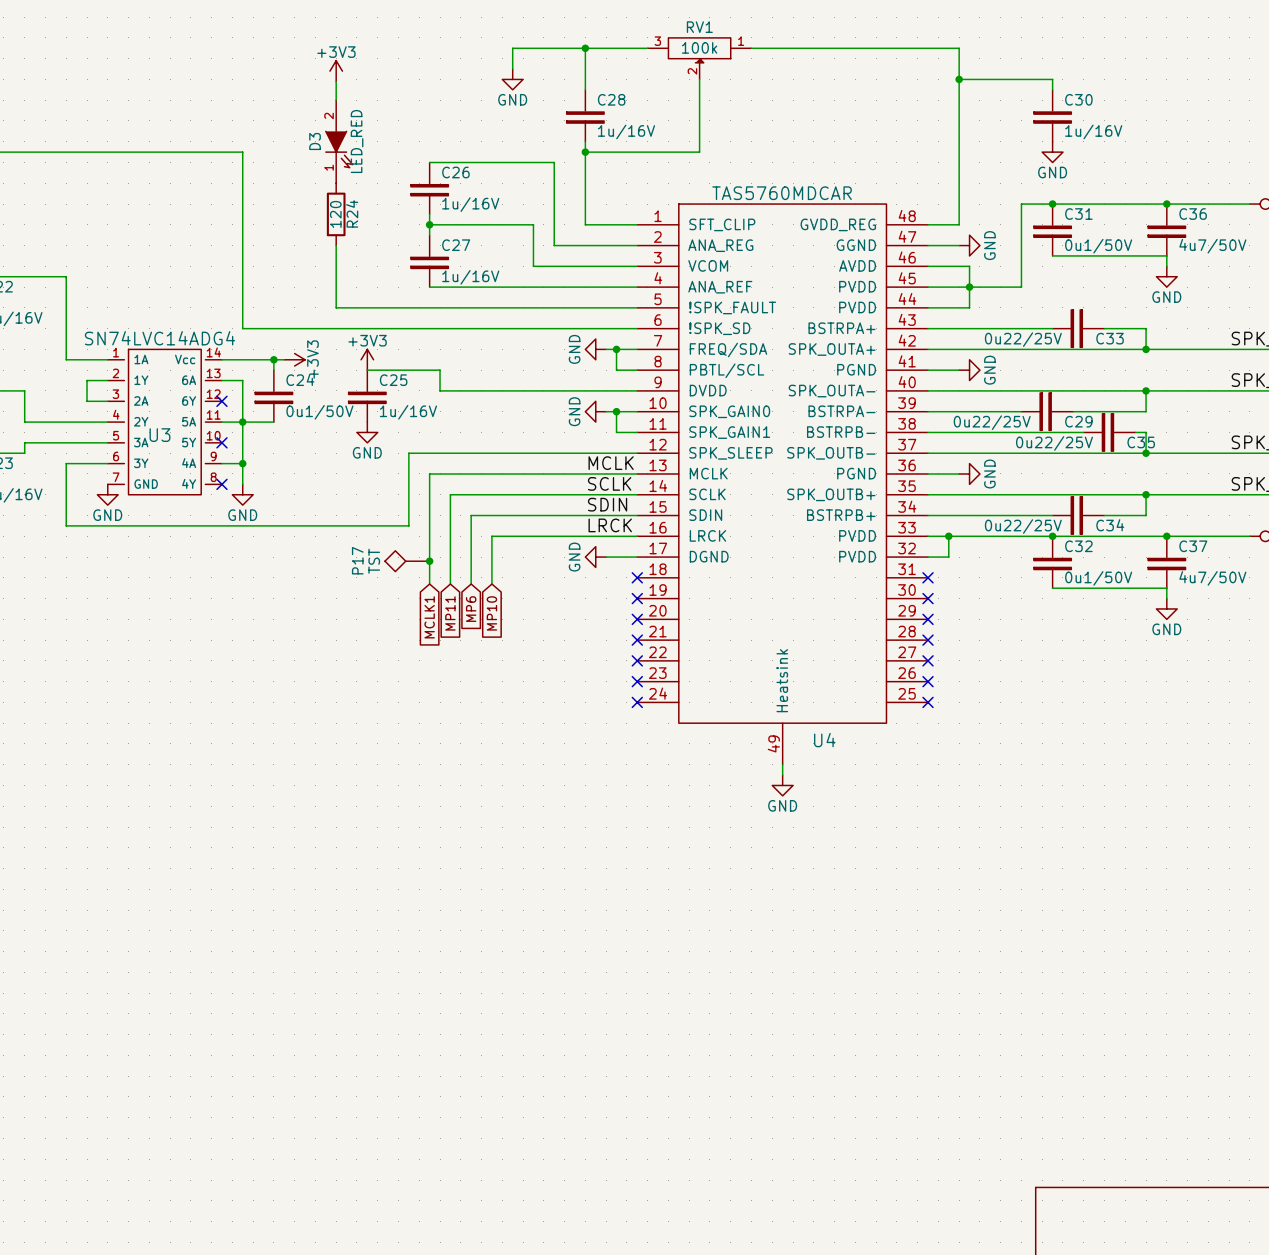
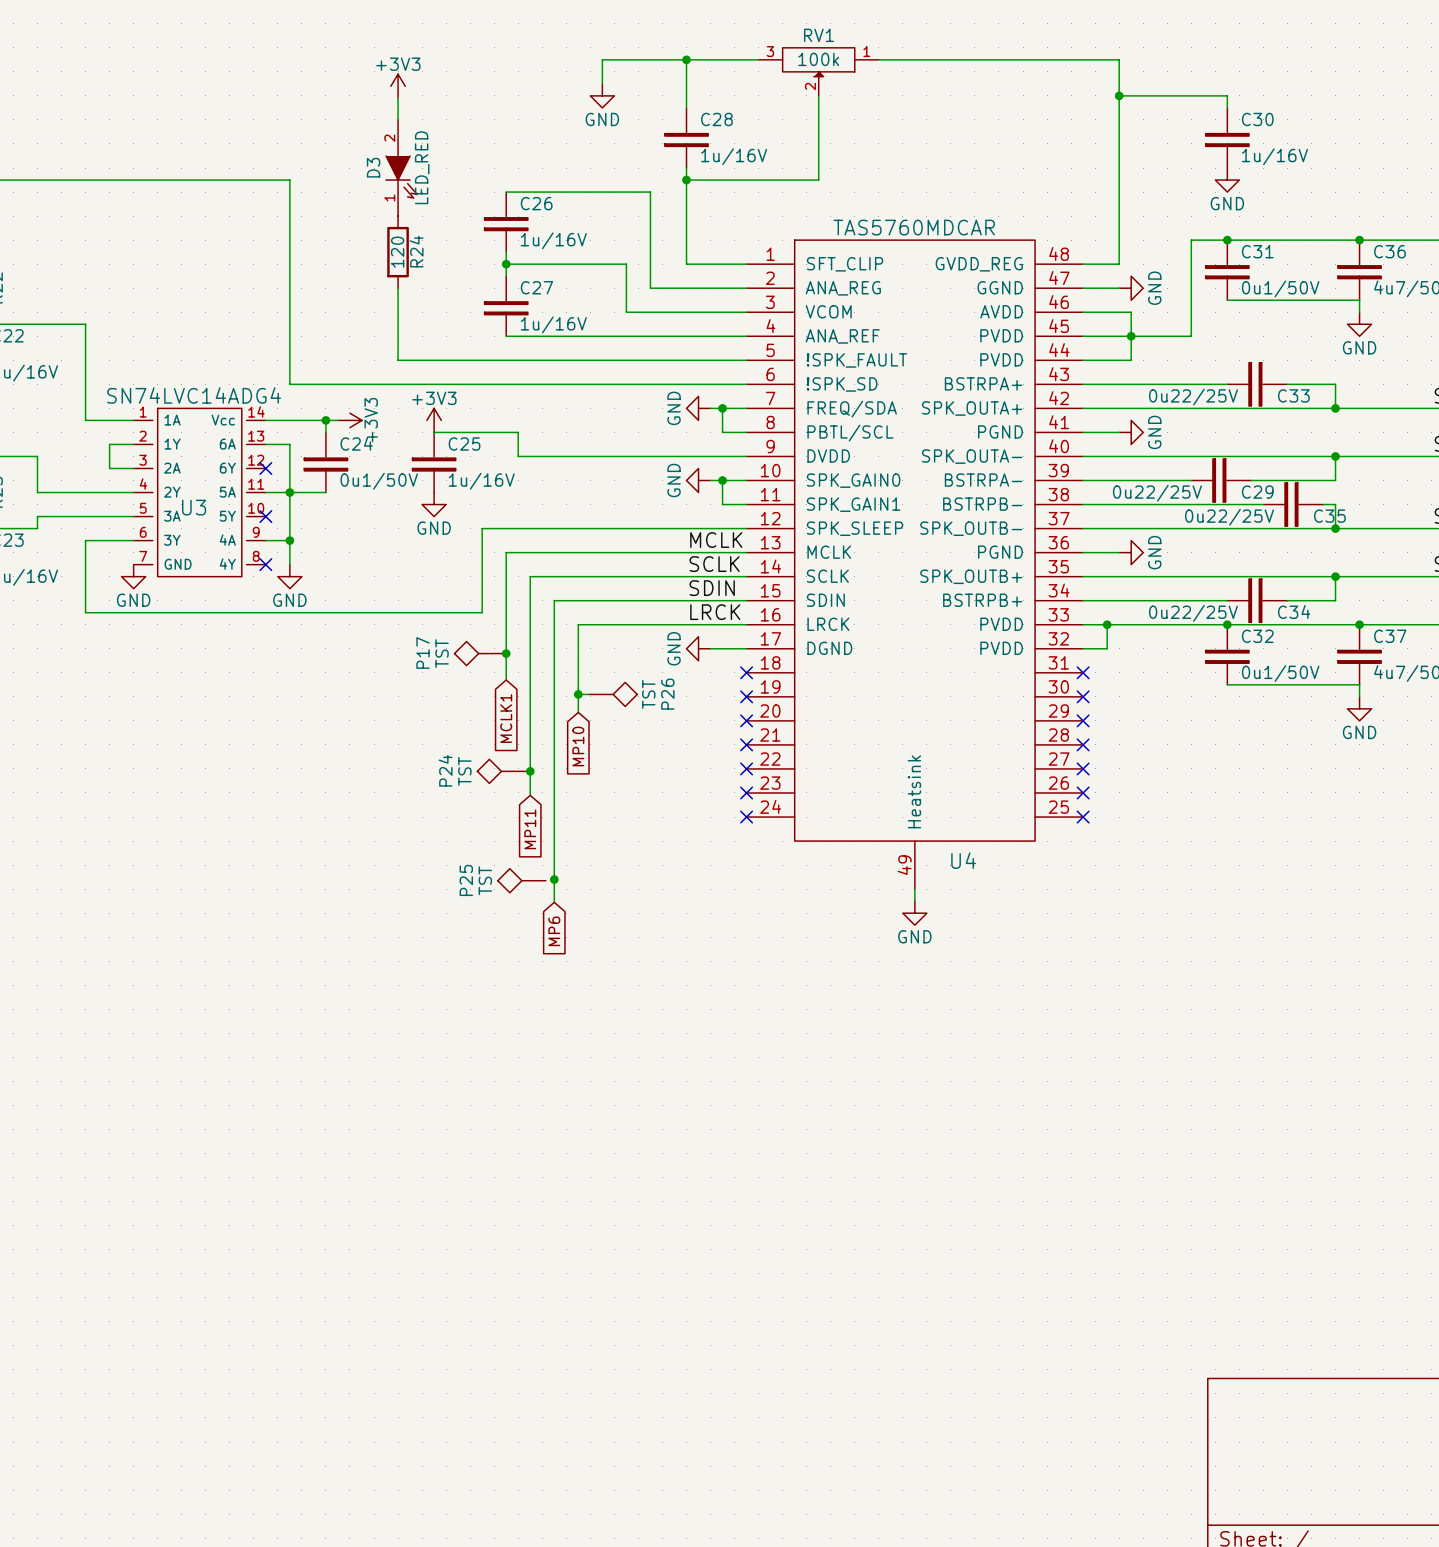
wire: none -> (530, 680) (530, 795)
wire: none -> (554, 680) (554, 902)
wire: none -> (578, 680) (578, 712)
wire: none -> (578, 694) (589, 694)
junction: none -> (578, 694)
P26: none -> TST (613, 694)
global label position: MP6 (471, 609) -> MP6 (554, 931)
global label position: MP11 (450, 613) -> MP11 (530, 829)
global label position: MP10 (491, 613) -> MP10 (578, 746)
P24: none -> TST (501, 771)
junction: none -> (530, 771)
junction: none -> (554, 879)
P25: none -> TST (521, 880)

